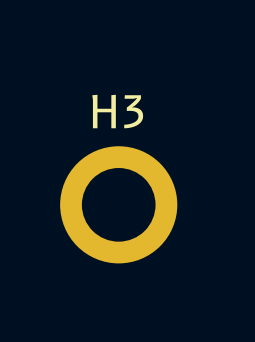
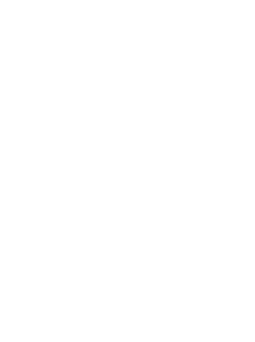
H3: (118, 204) -> none

